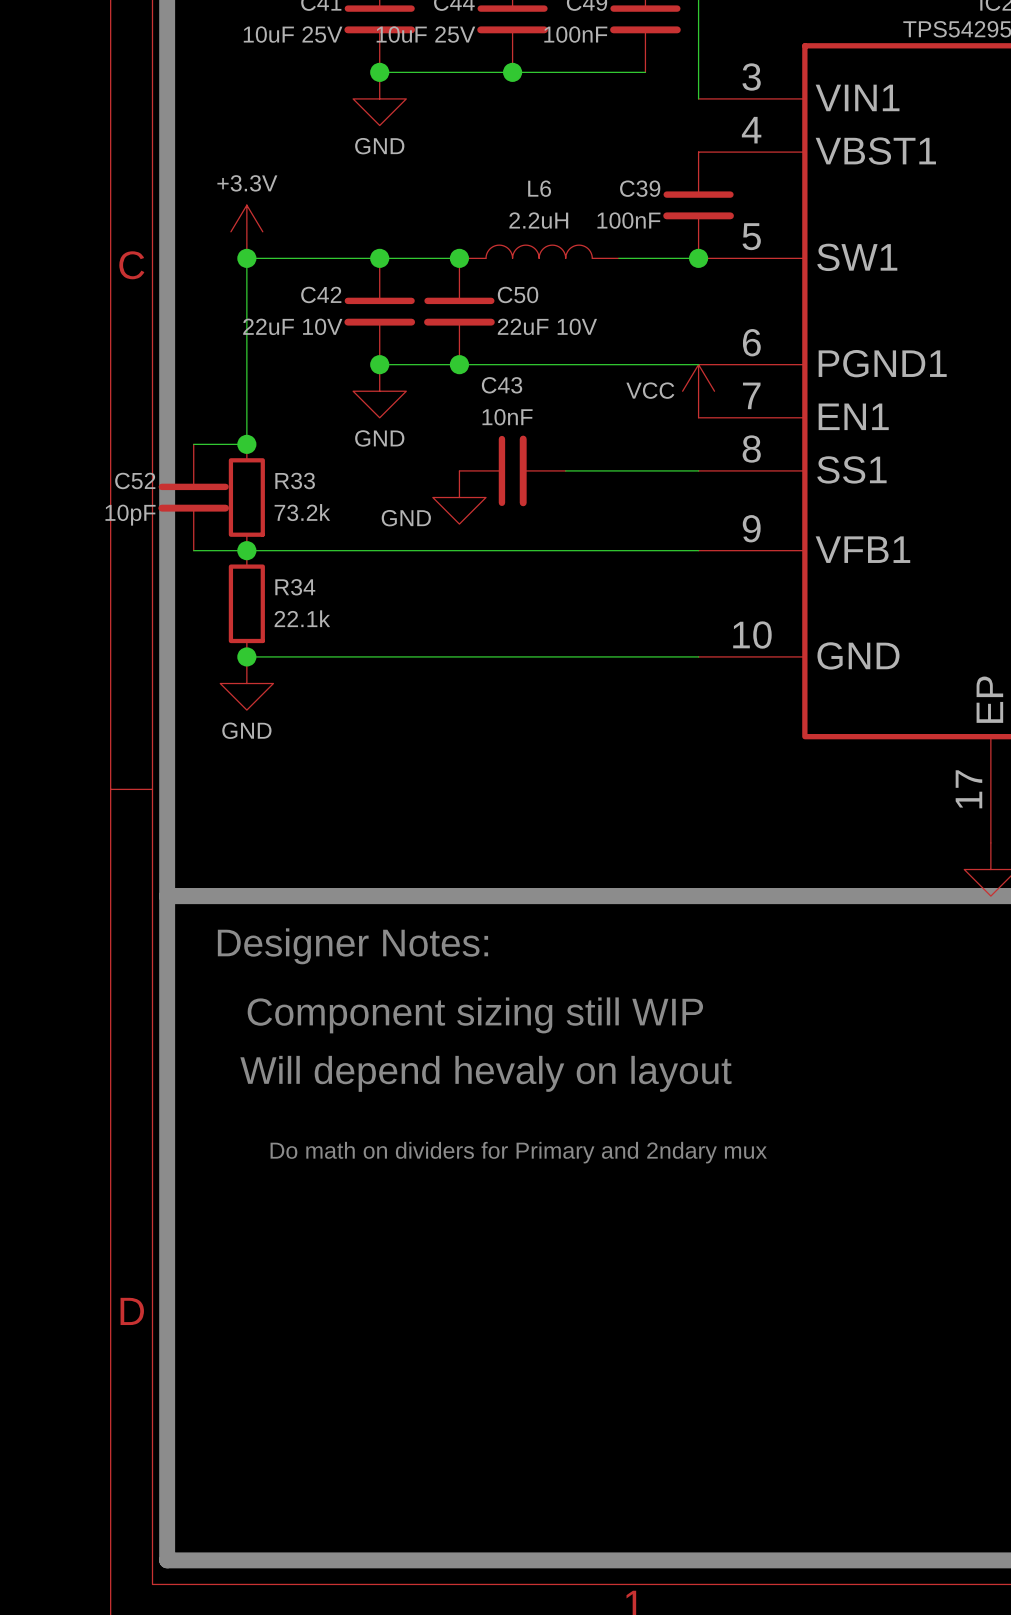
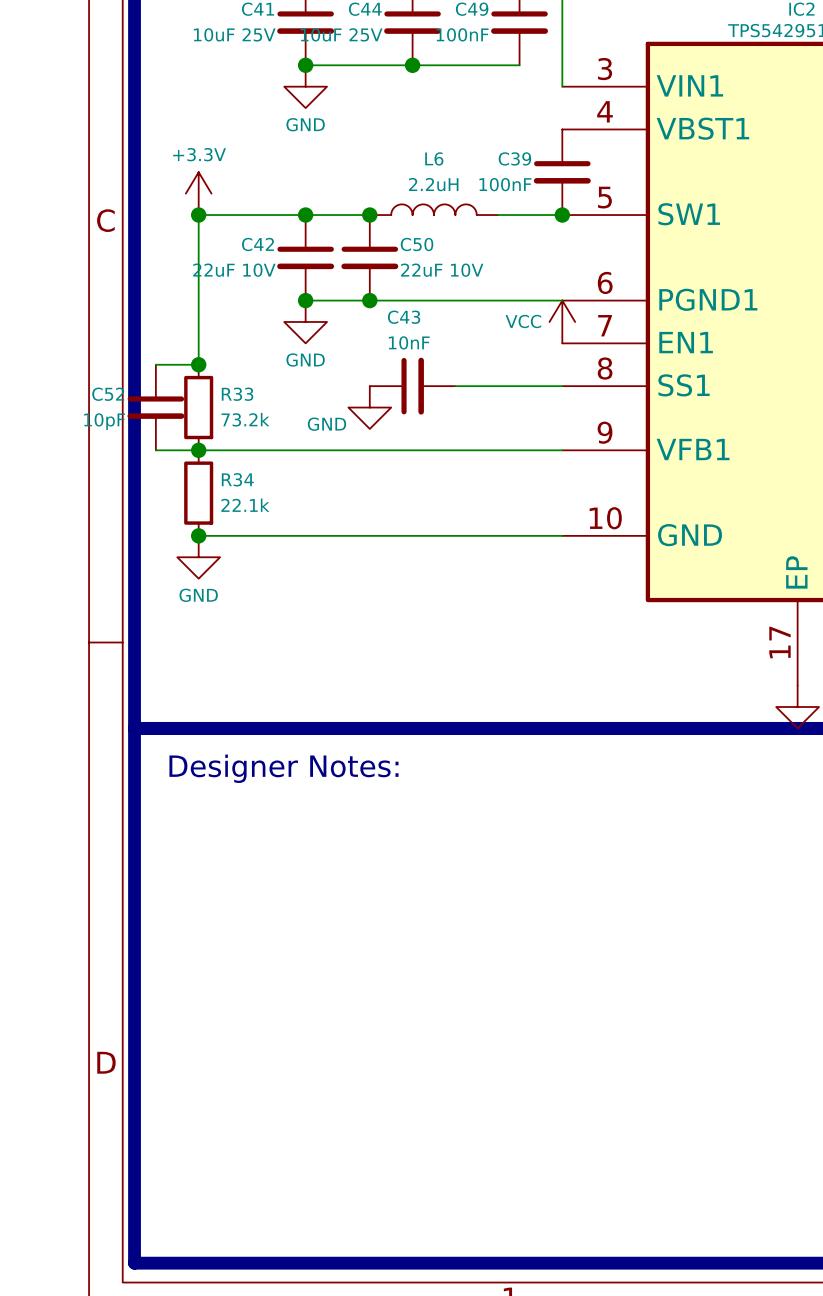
text: Component sizing still WIP (475, 1015) -> none
text: Will depend hevaly on layout (485, 1073) -> none
text: Do math on dividers for Primary and 2ndary mux (518, 1152) -> none

